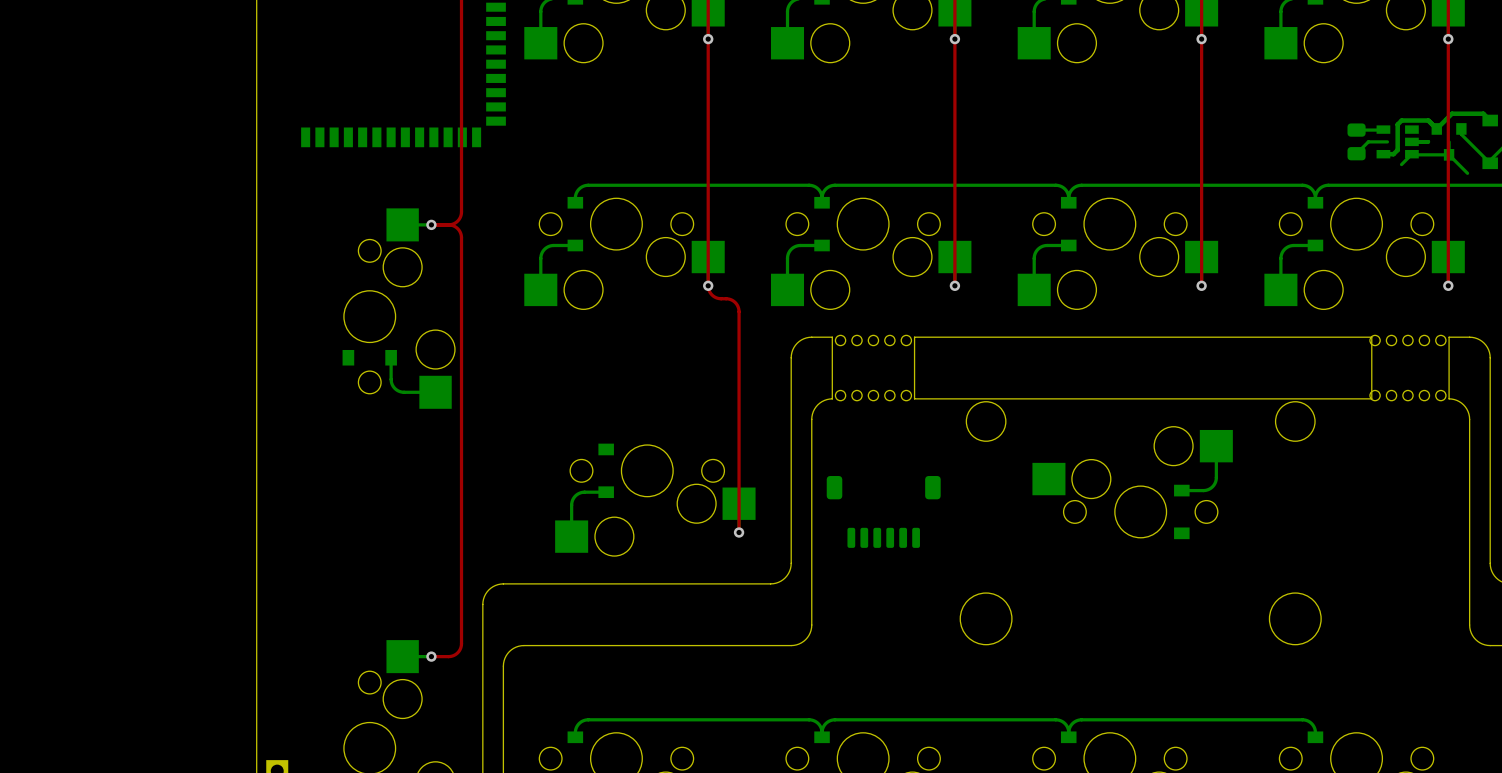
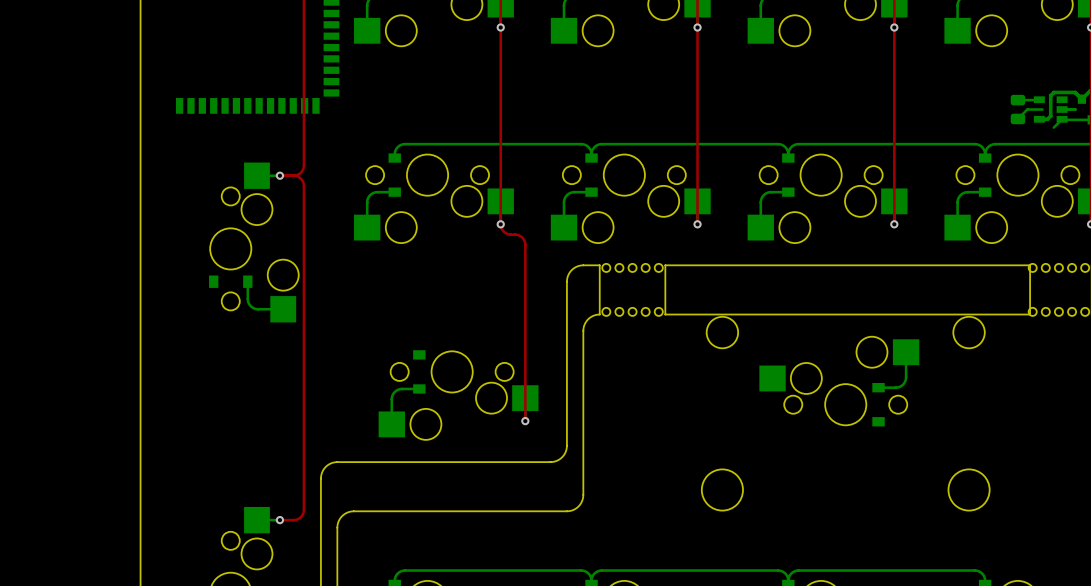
part: (883, 511) -> none

